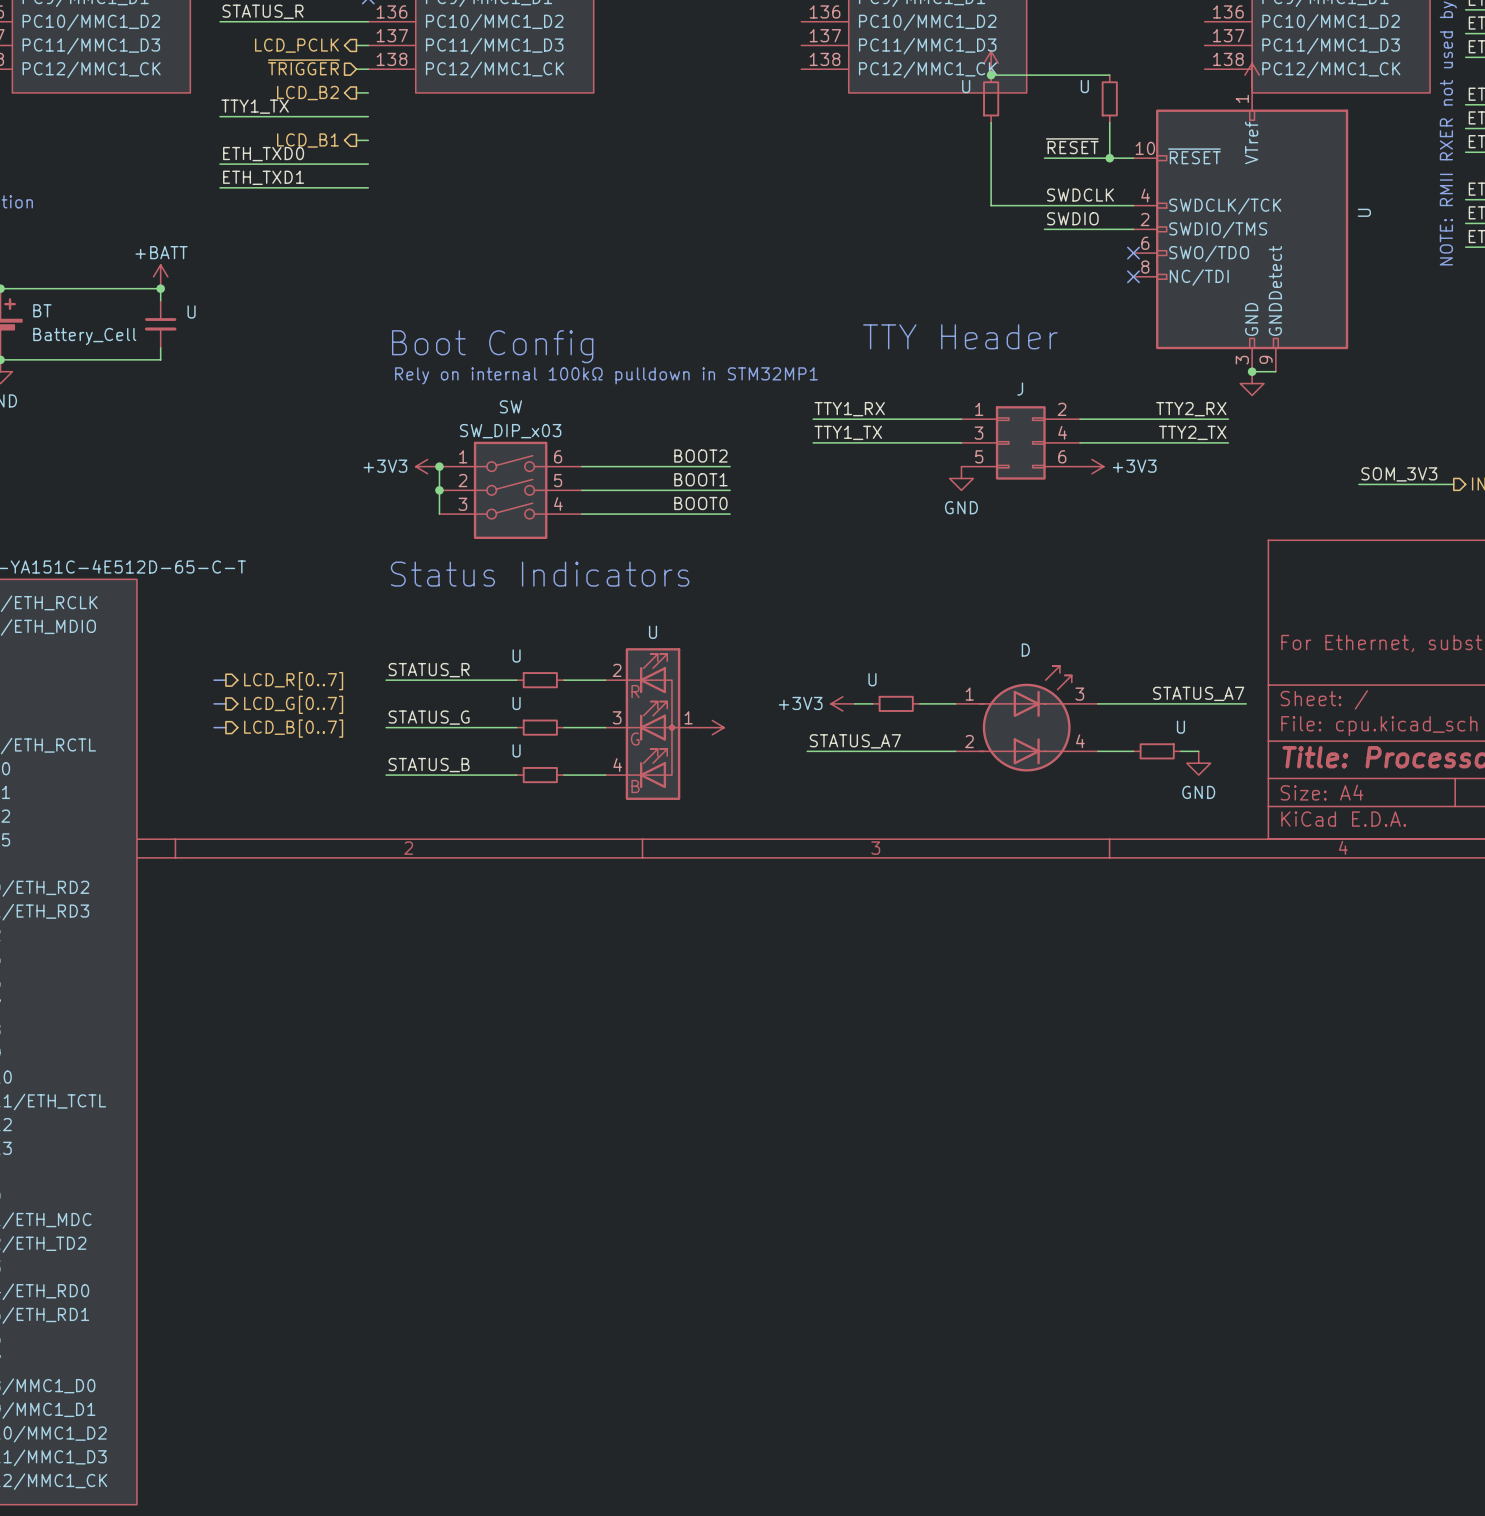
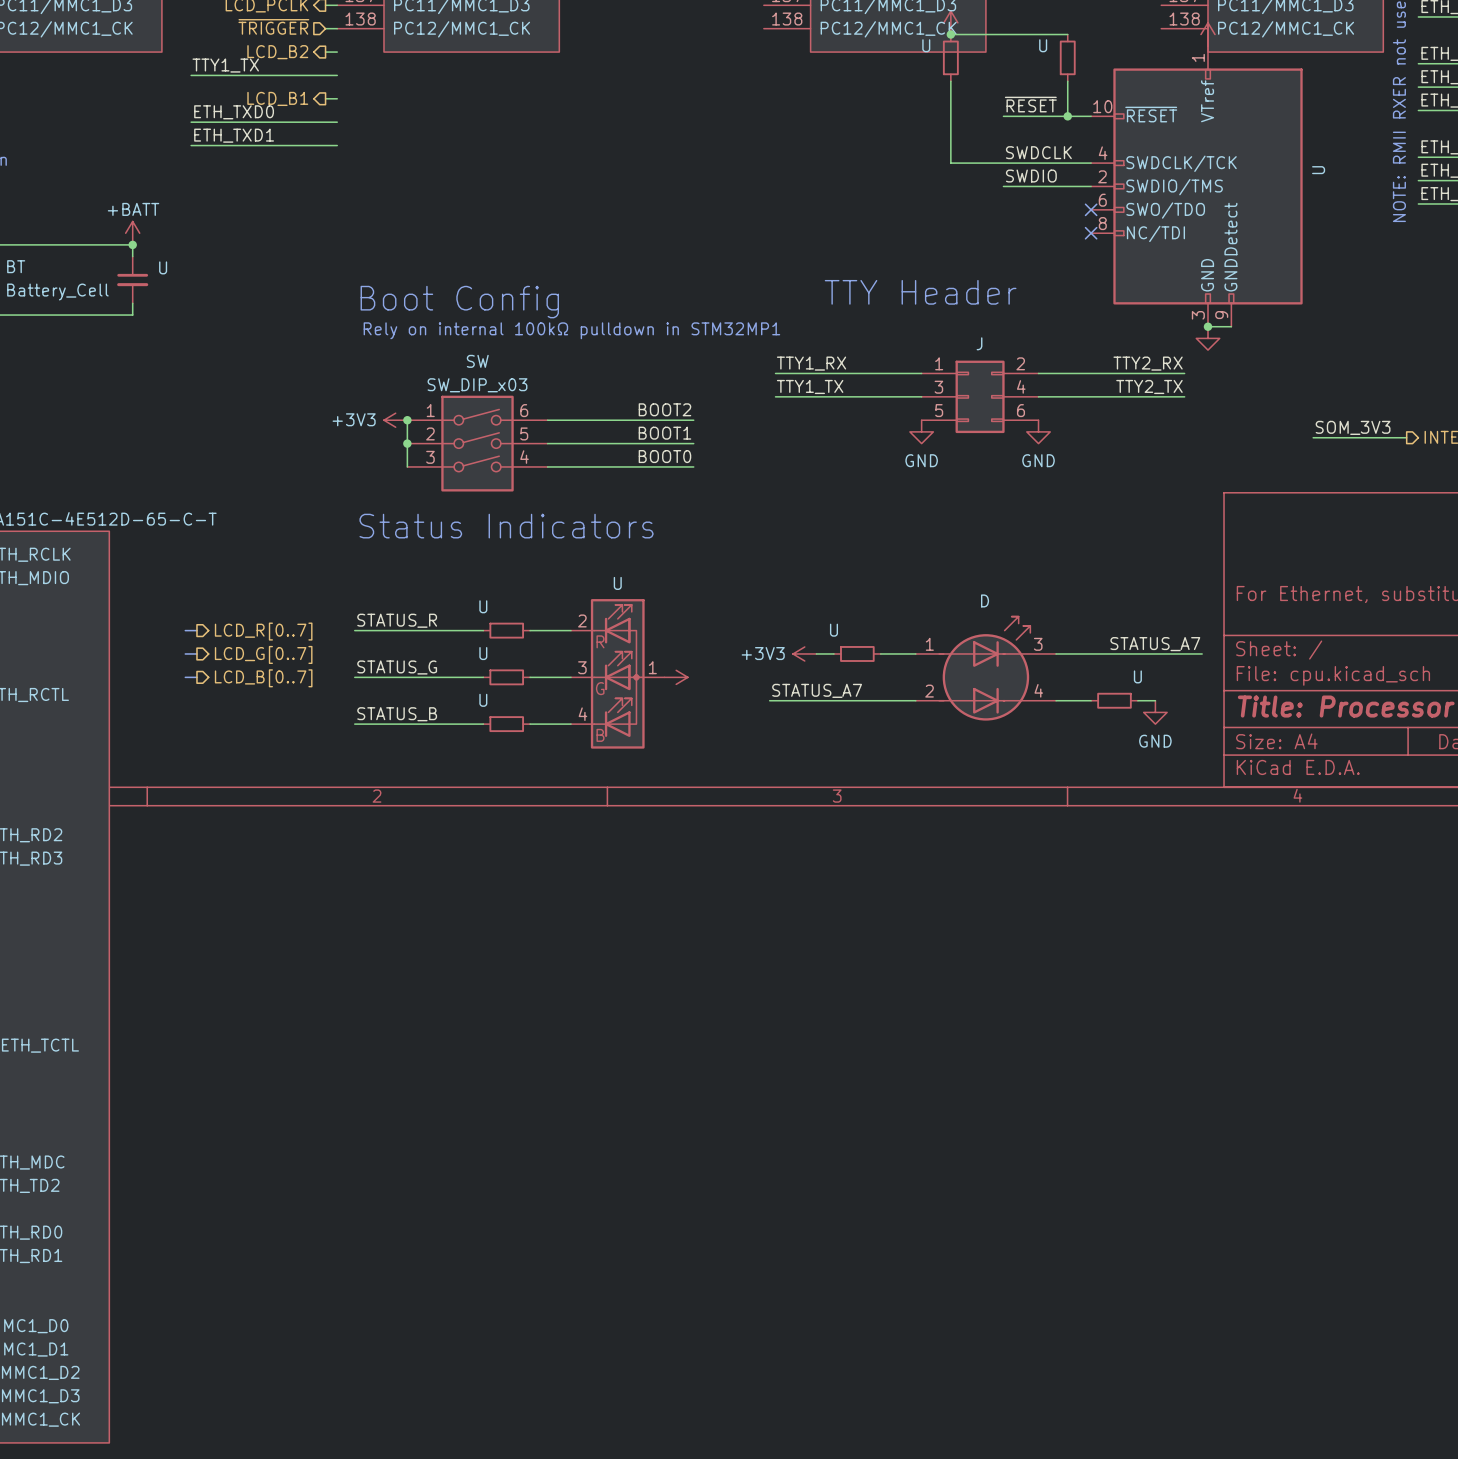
power symbol: +3V3 (1091, 466) -> none
power symbol: none -> GND (1038, 431)

